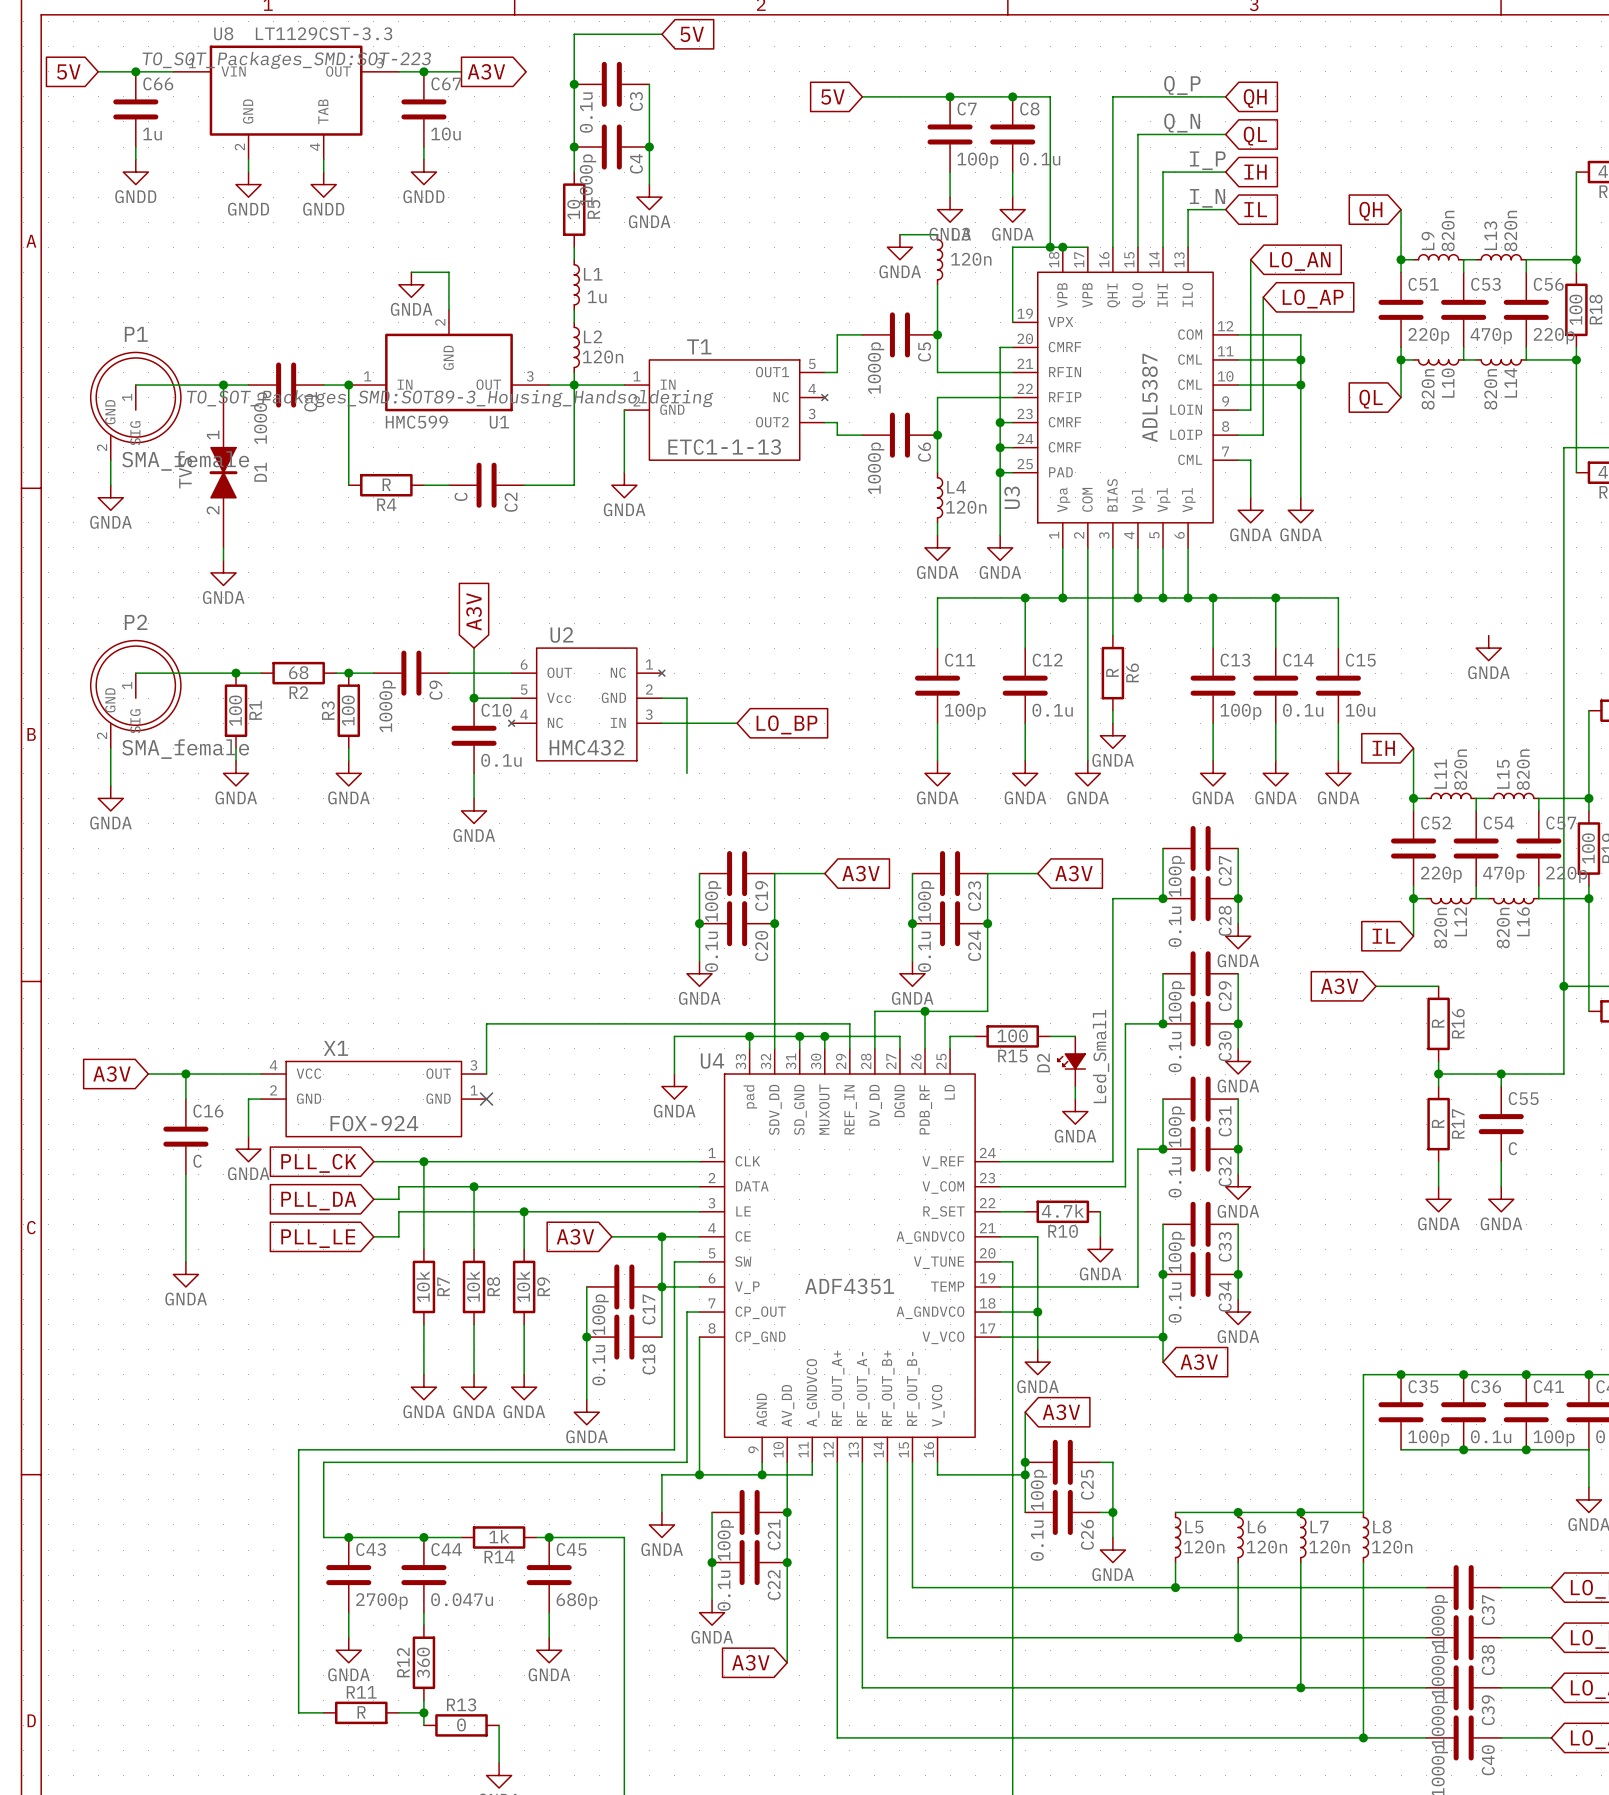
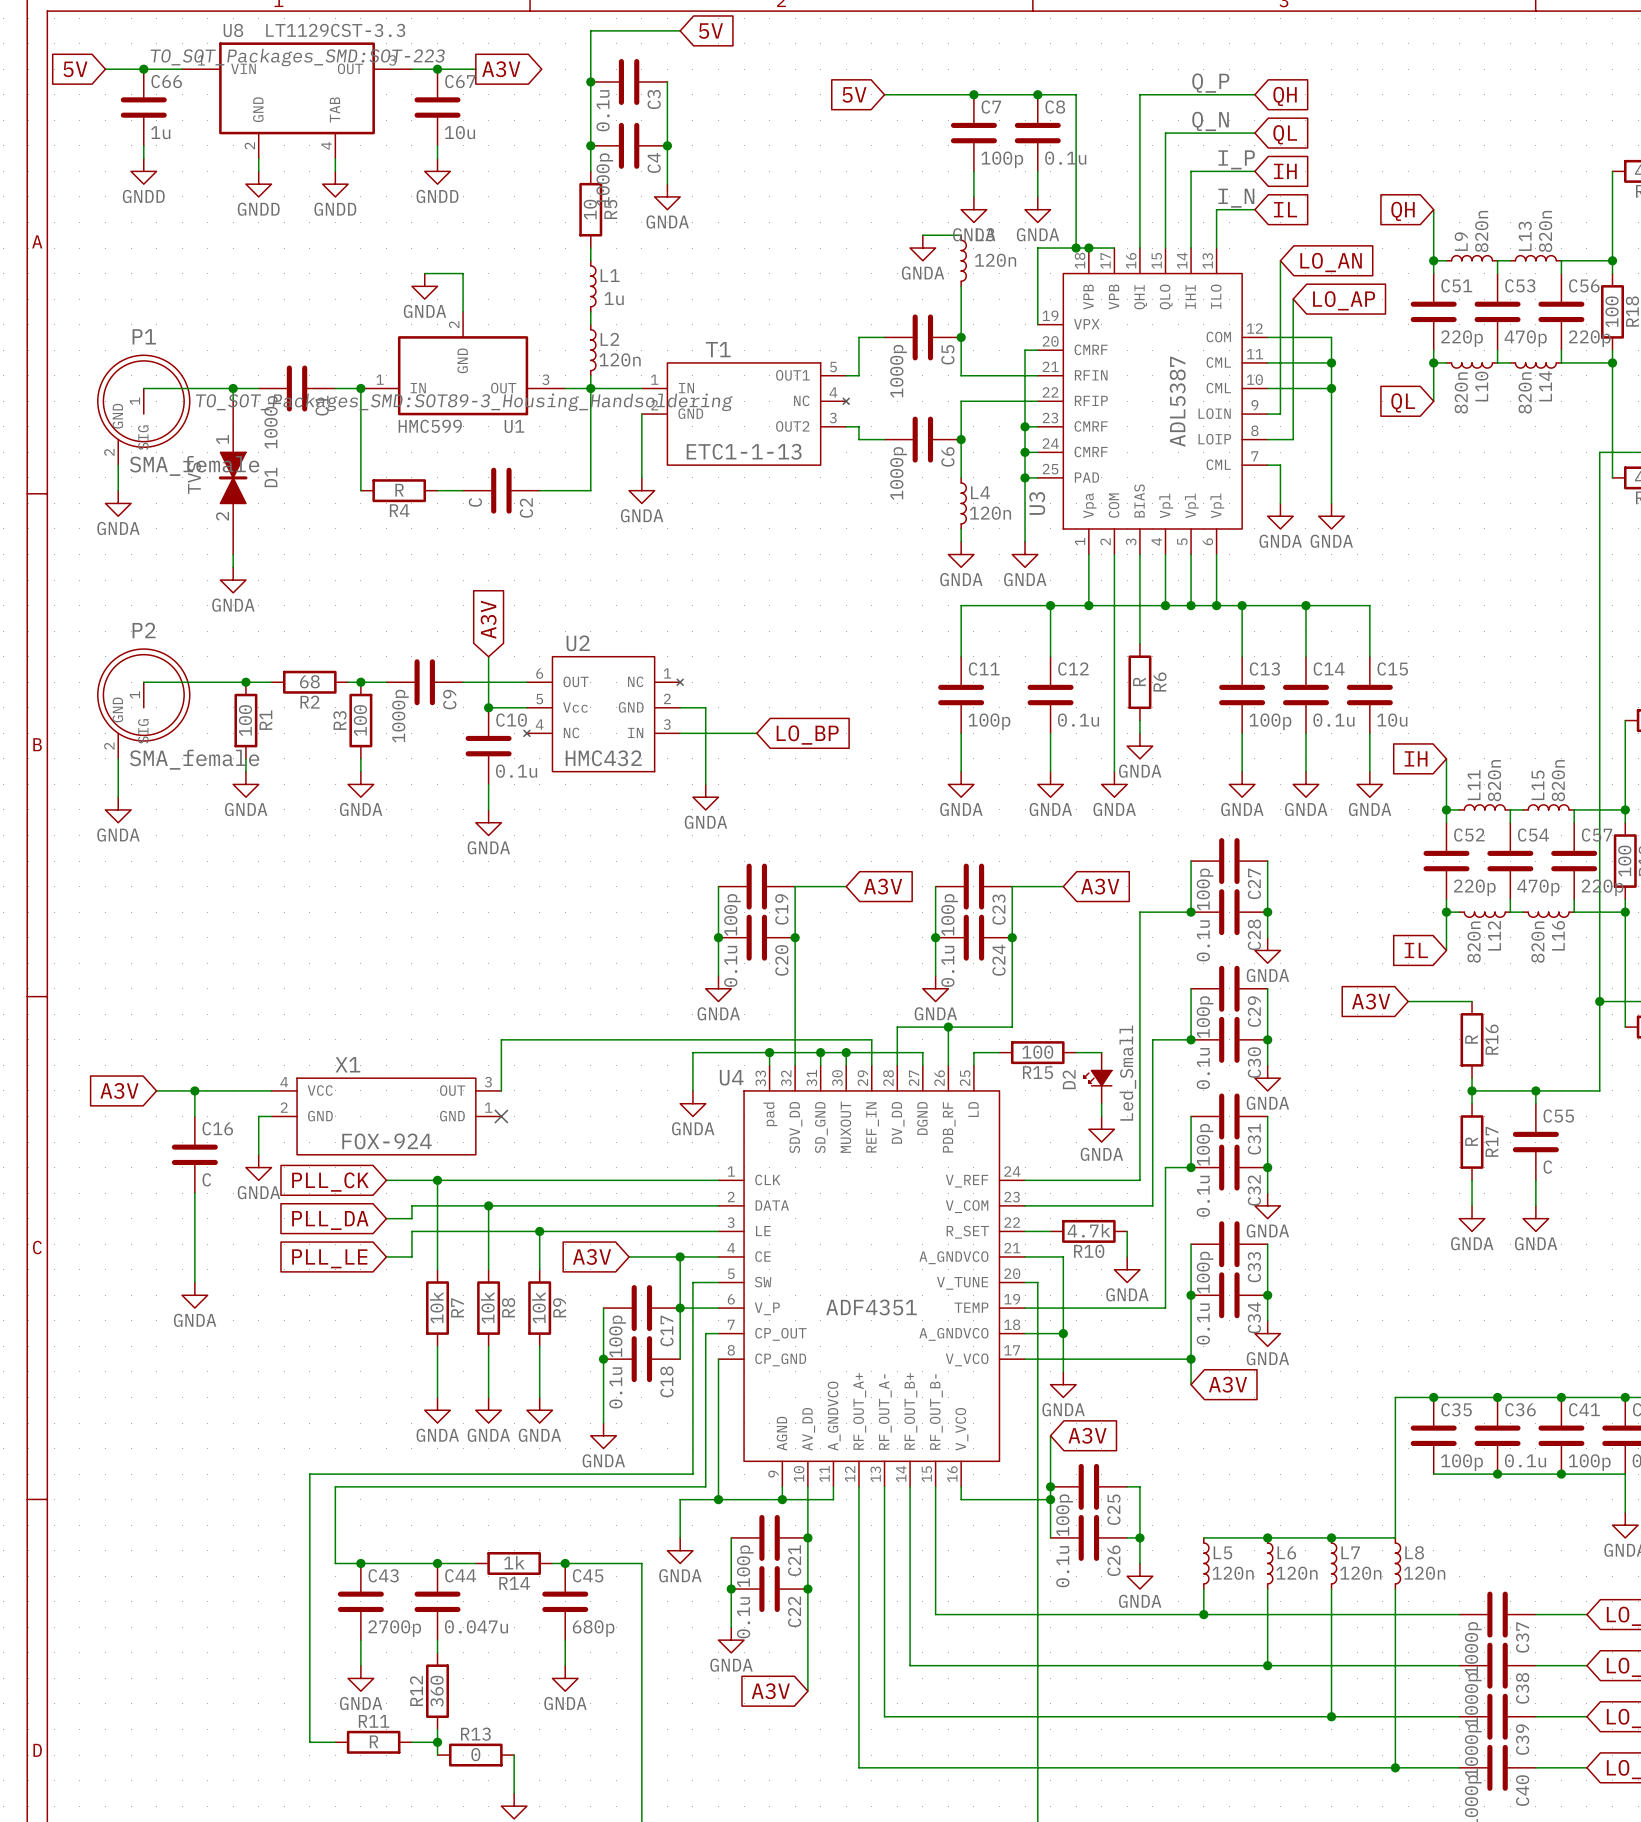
power symbol: GNDA (1488, 648) -> none
power symbol: none -> GNDA (705, 797)

